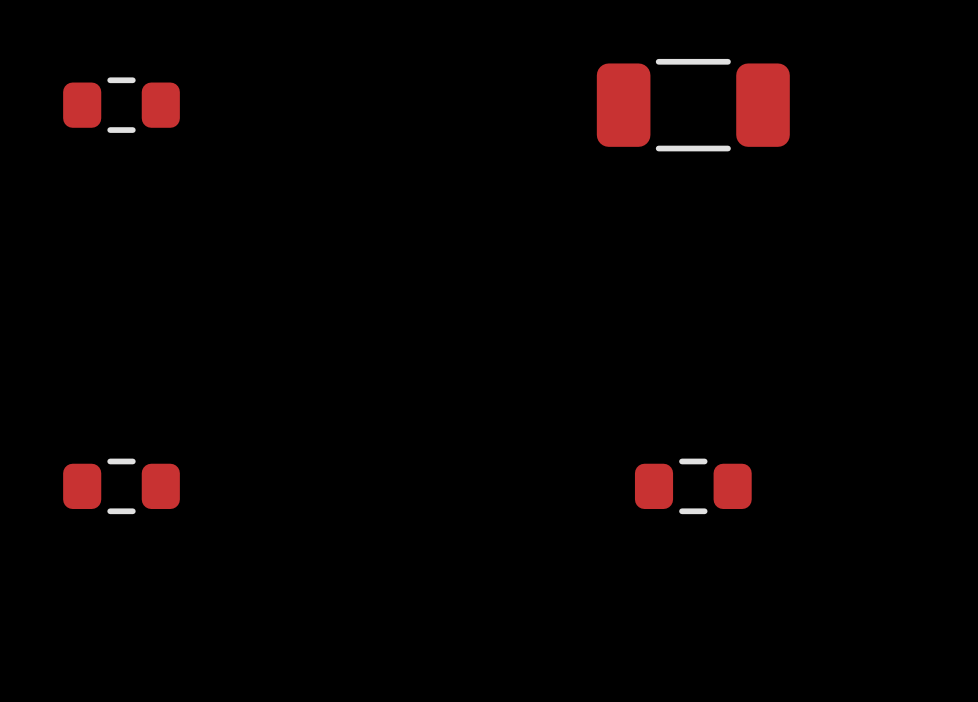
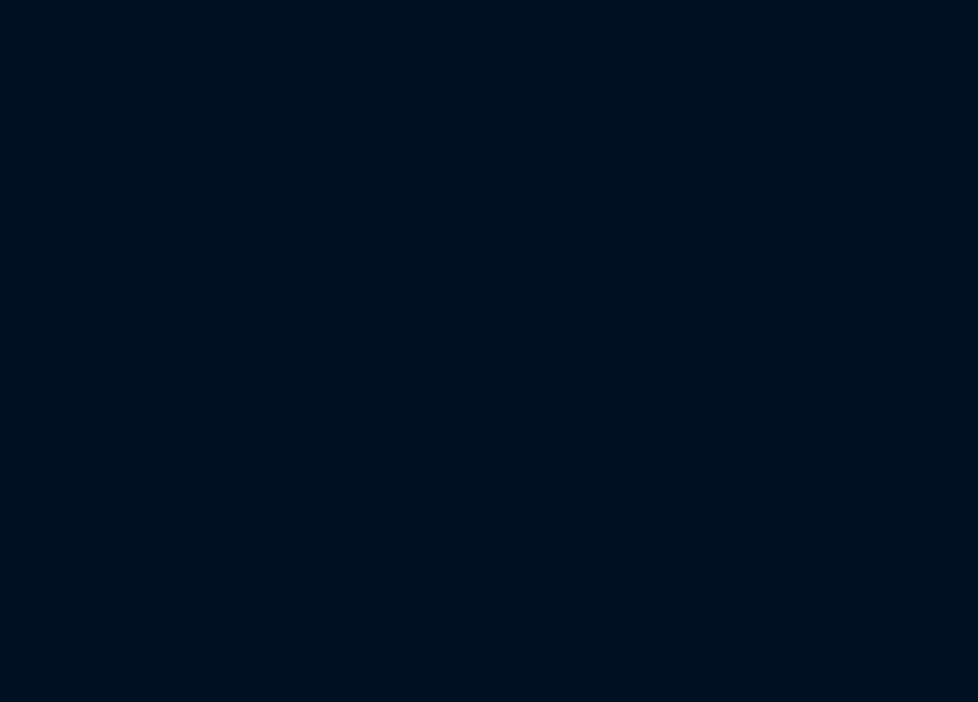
part: (121, 105) -> none
part: (693, 105) -> none
part: (121, 486) -> none
part: (693, 486) -> none

